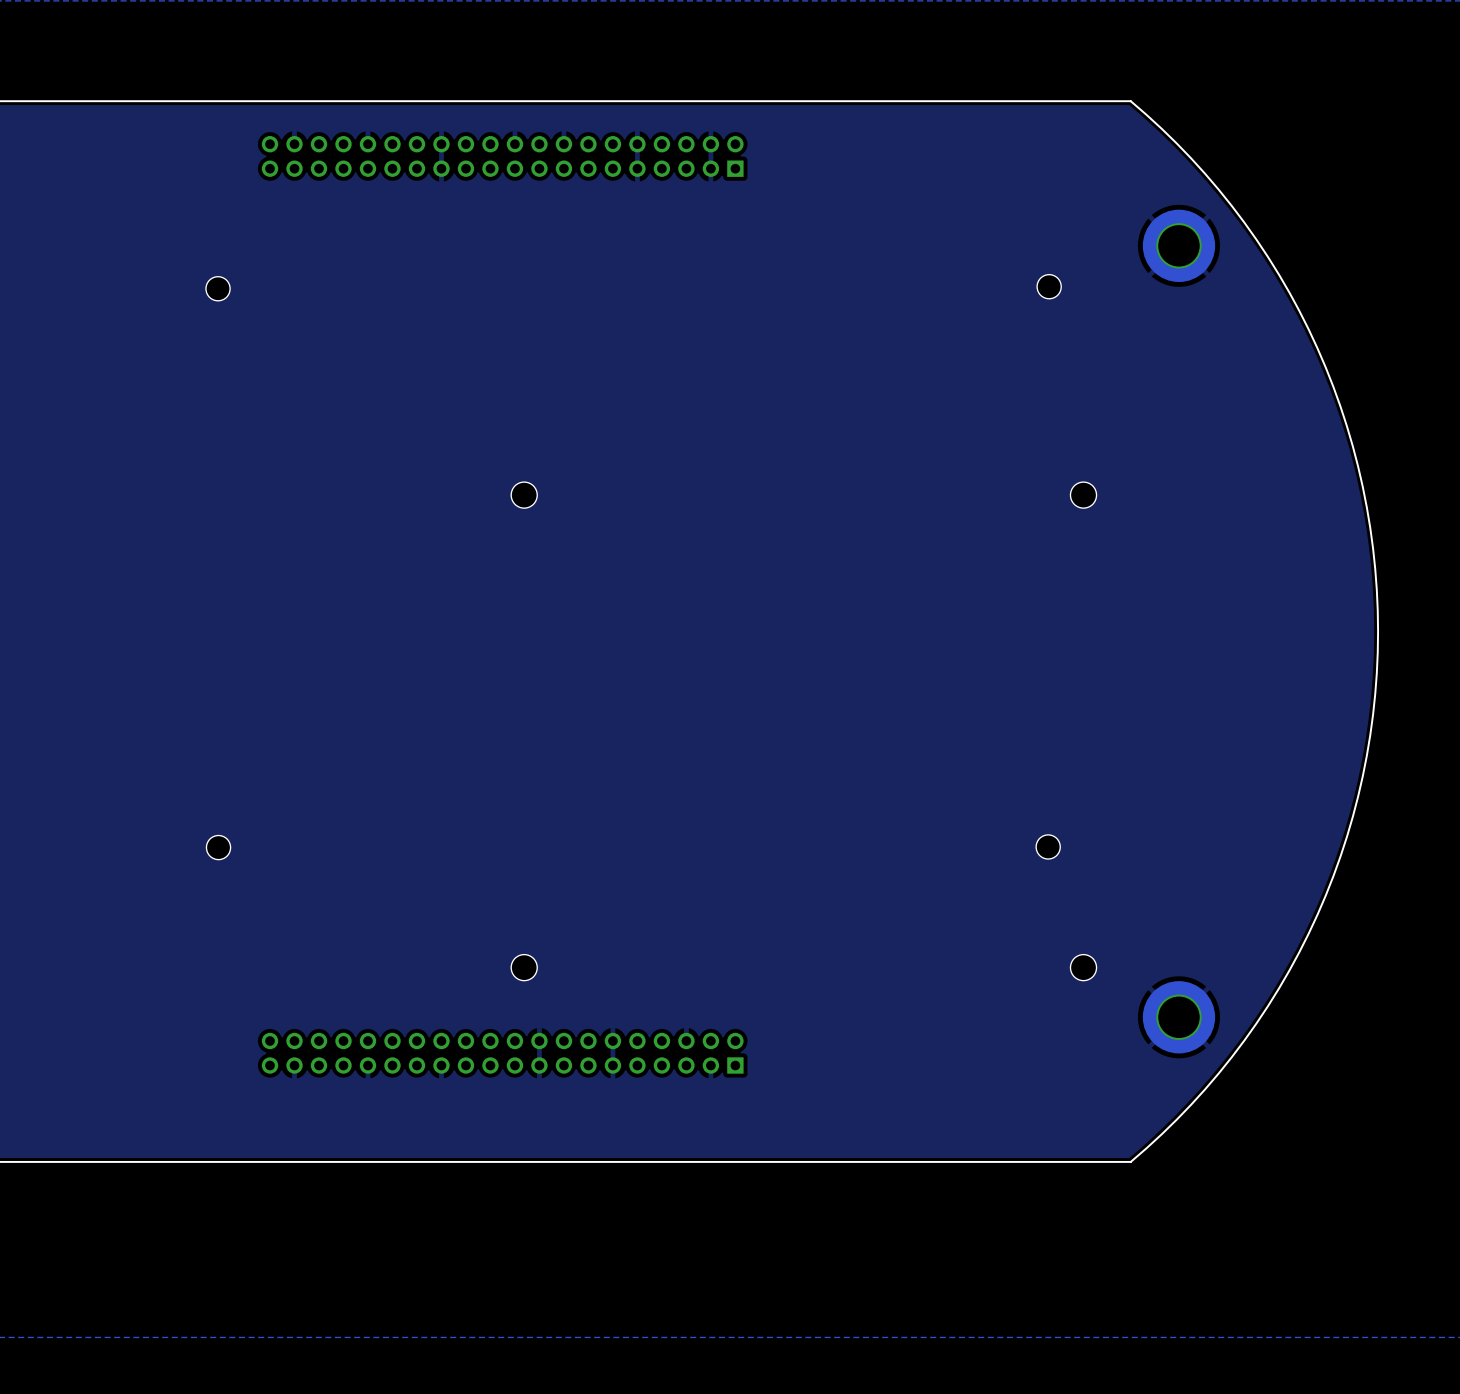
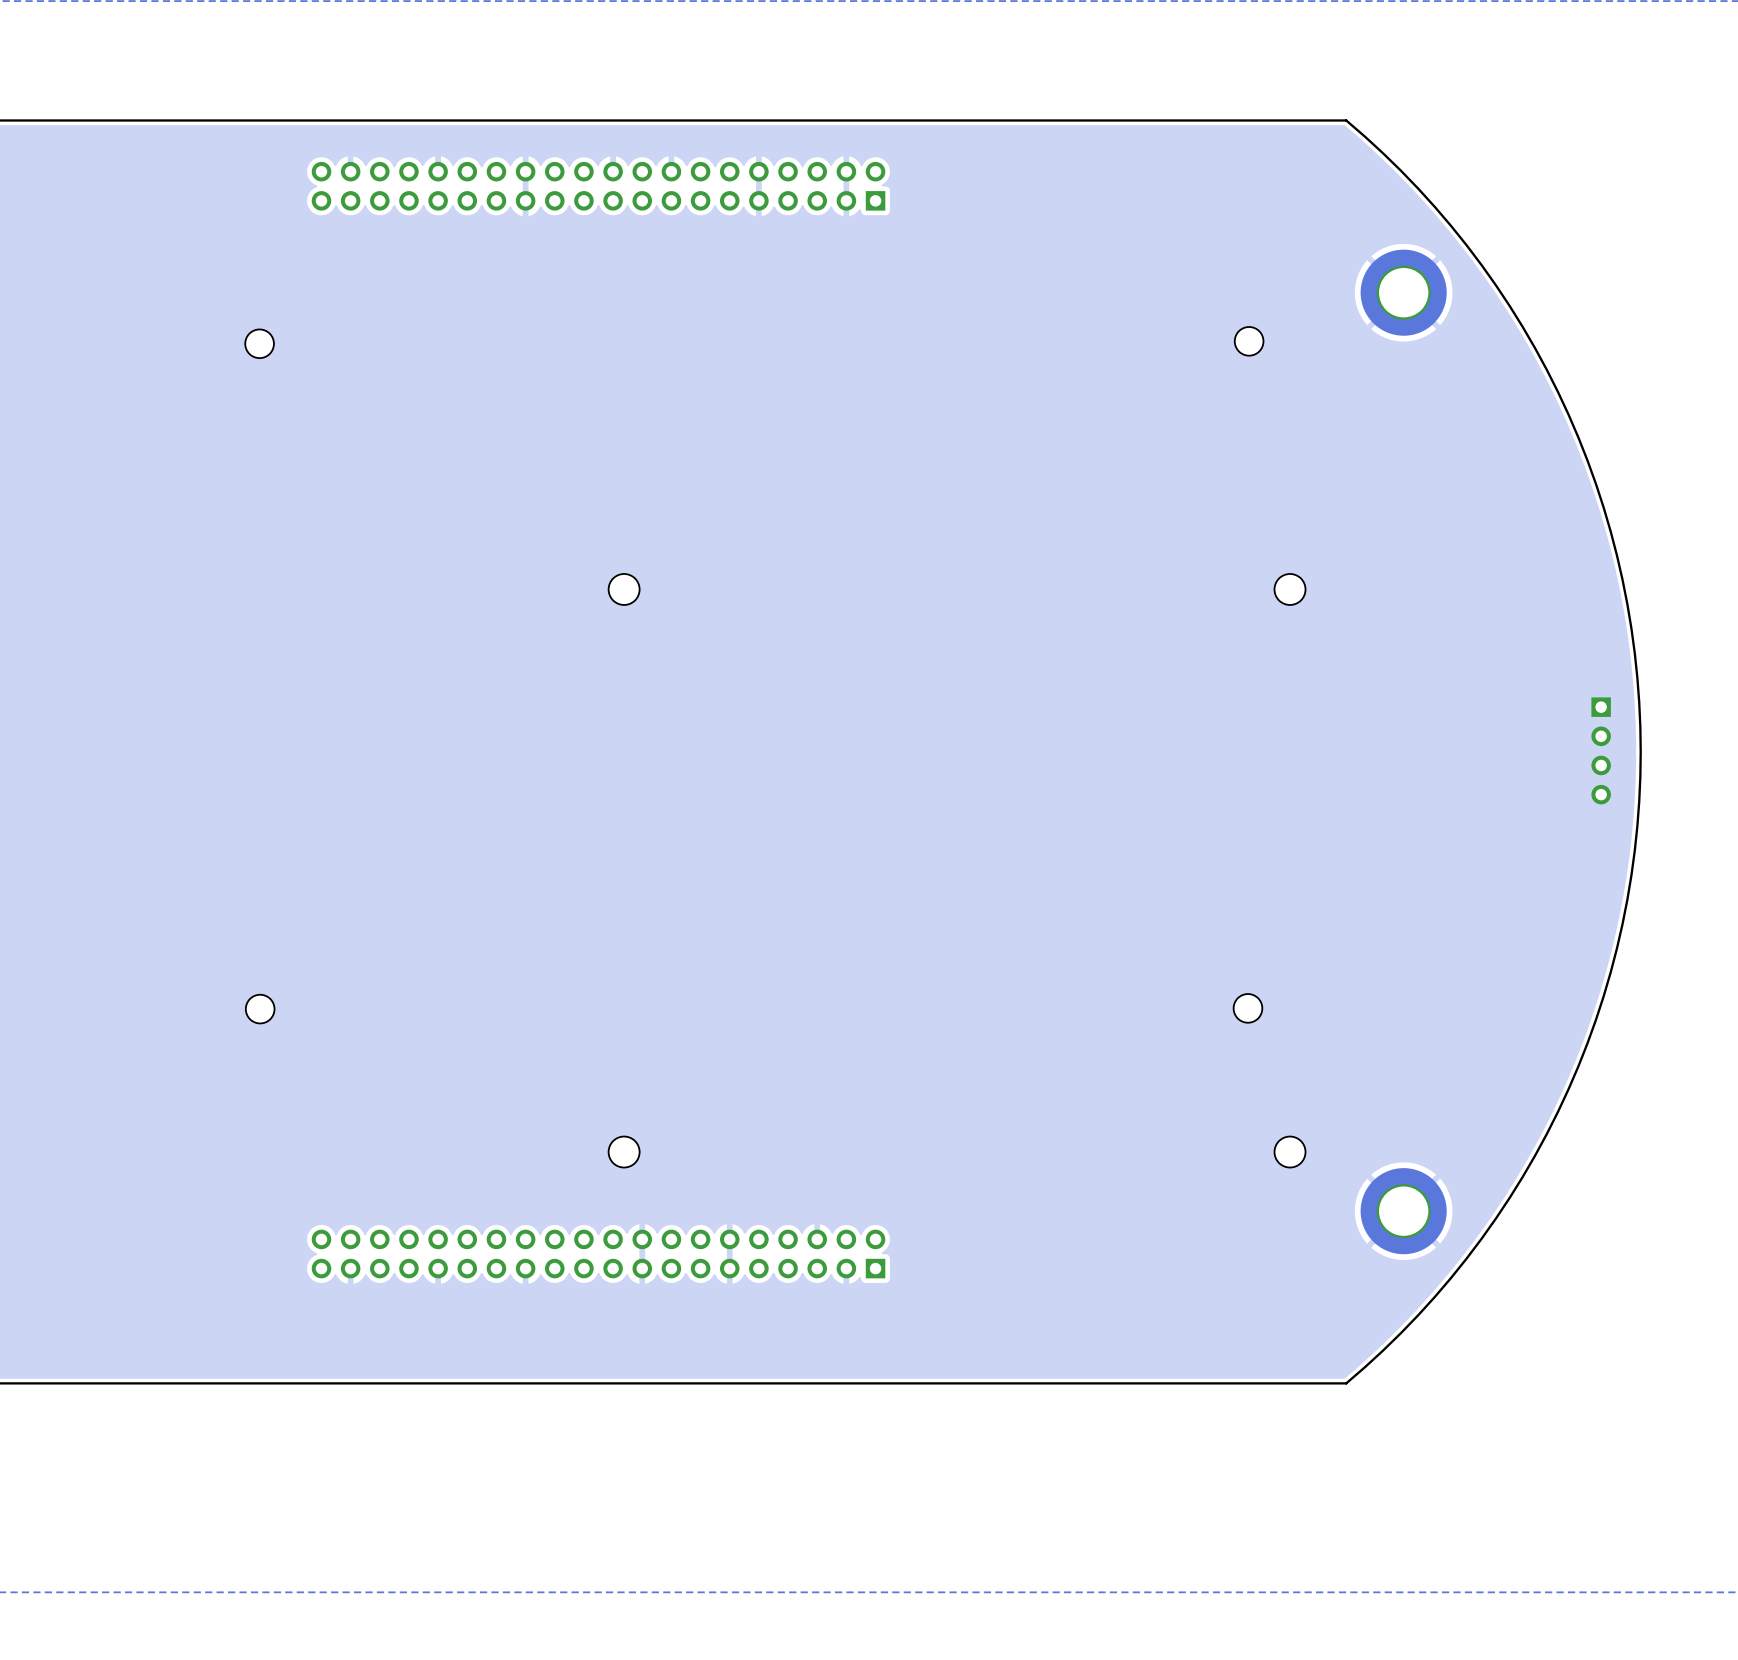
part: none -> (1601, 750)

